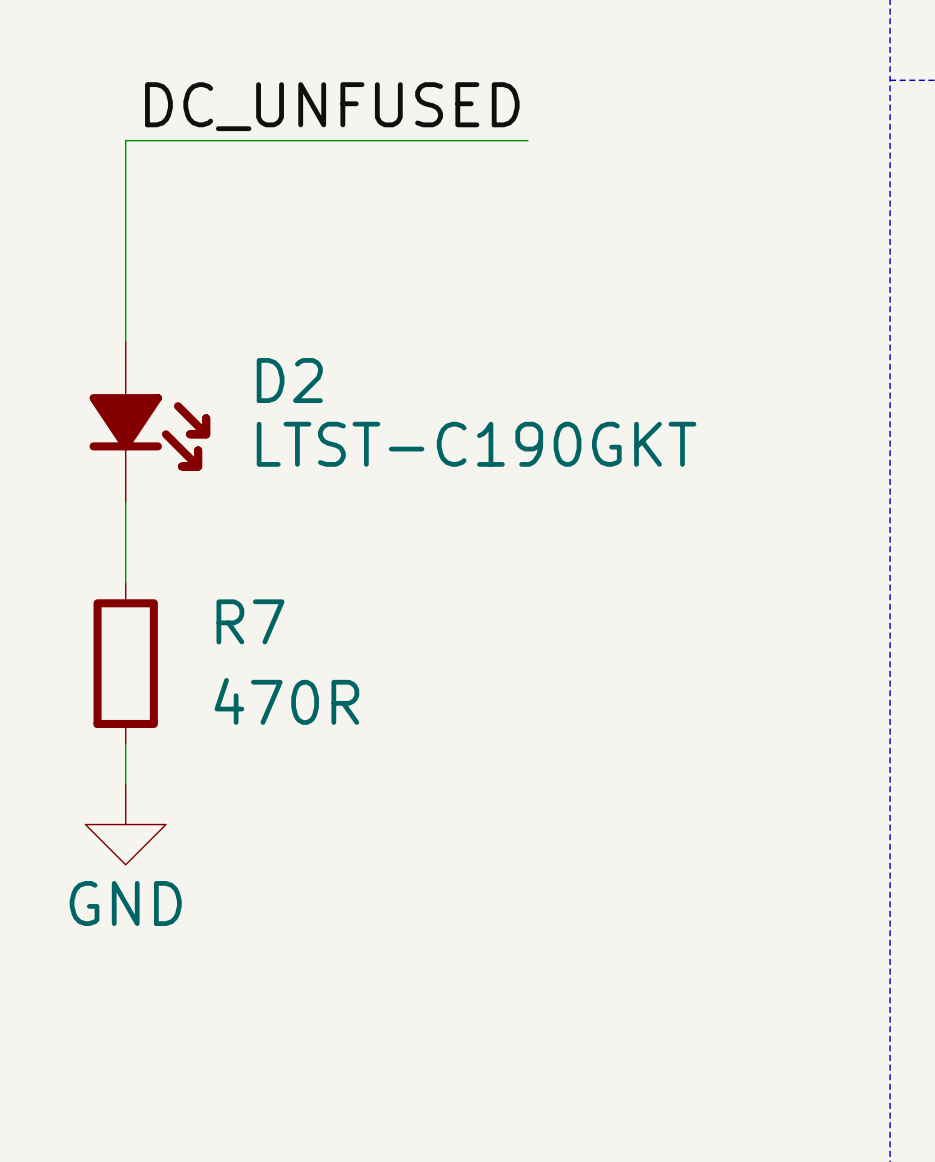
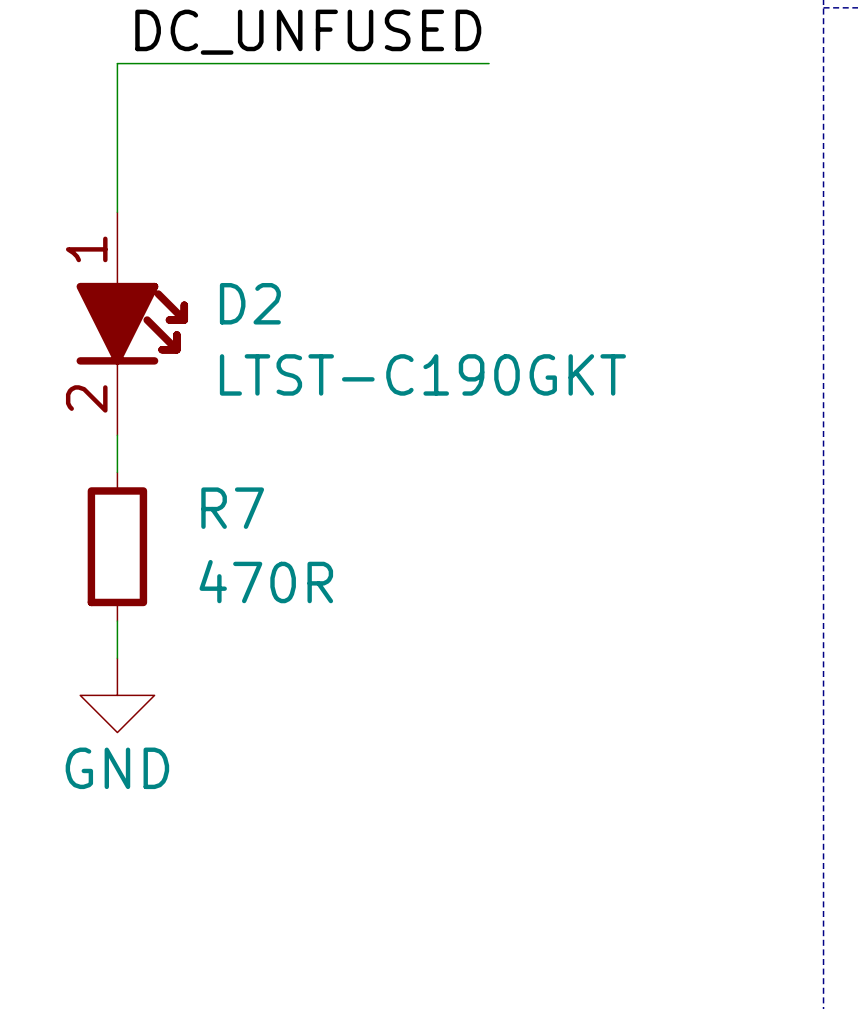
D2 symbol: [89, 341, 211, 503] -> [76, 212, 189, 436]

